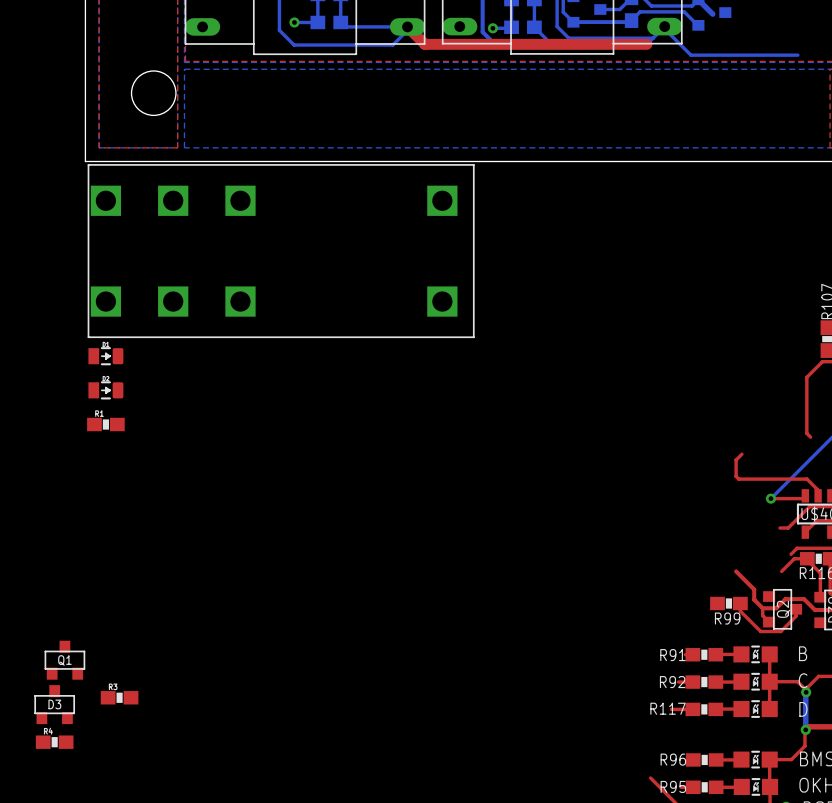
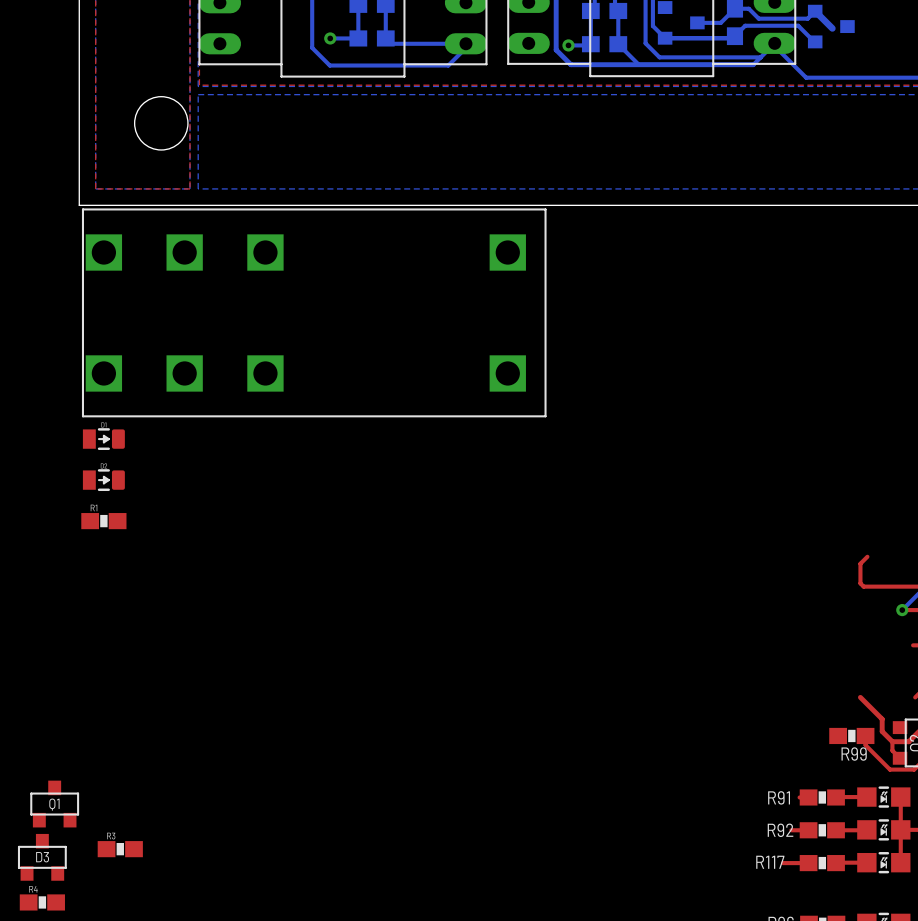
top track: (407, 26) (424, 44) (646, 44) -> none

